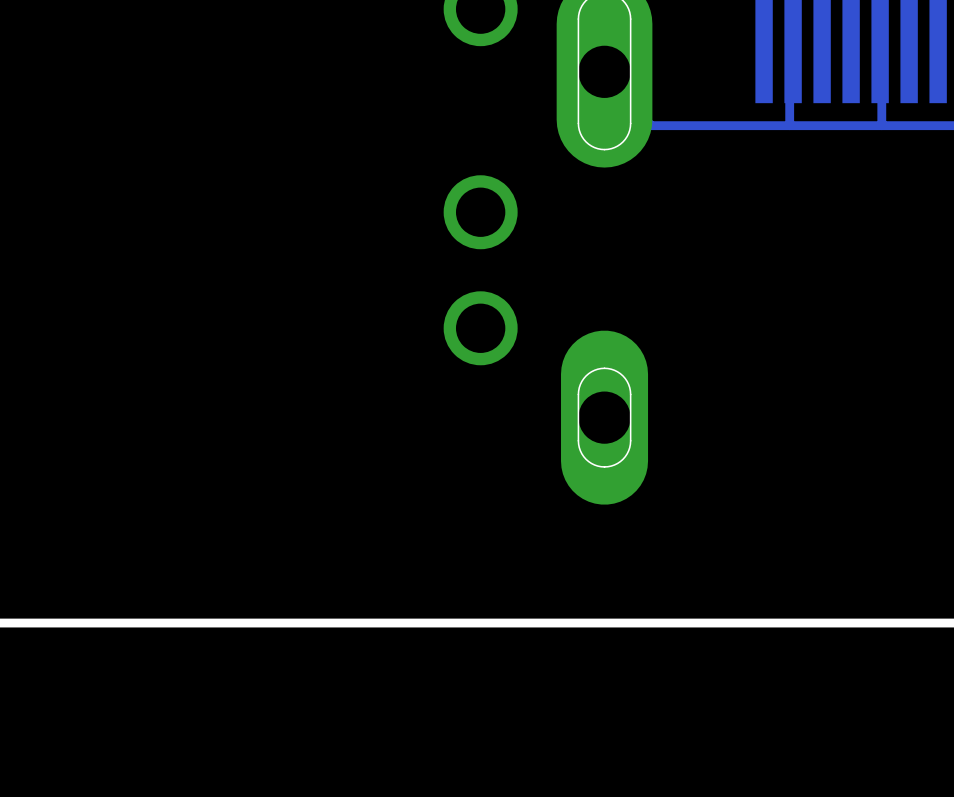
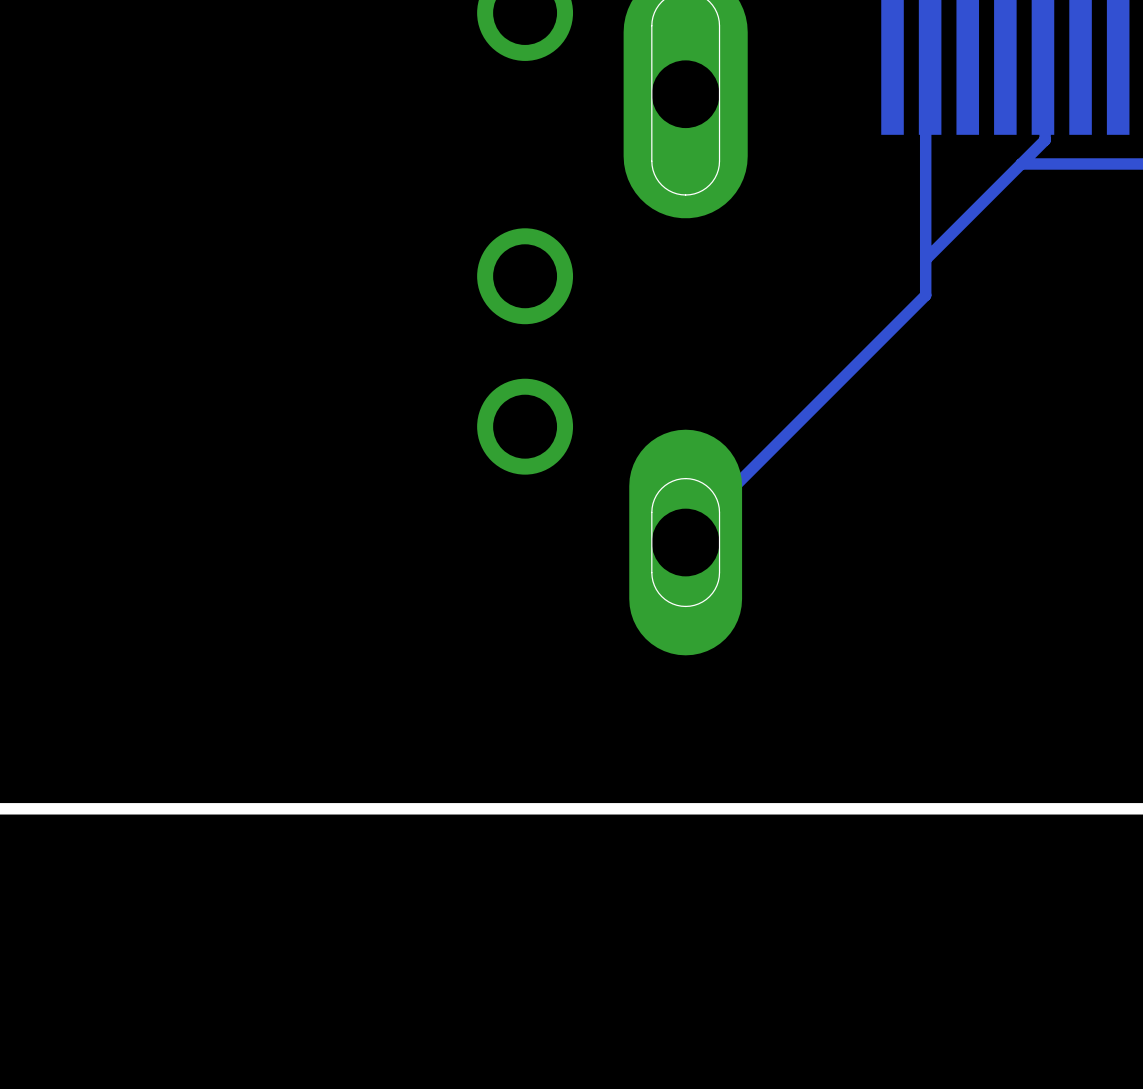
bottom track: (604, 71) (605, 79) (651, 125) (863, 125) -> none
bottom track: (881, 107) (881, 125) -> (1045, 140) (925, 259)
bottom track: none -> (925, 163) (925, 295) (686, 534) (685, 542)

